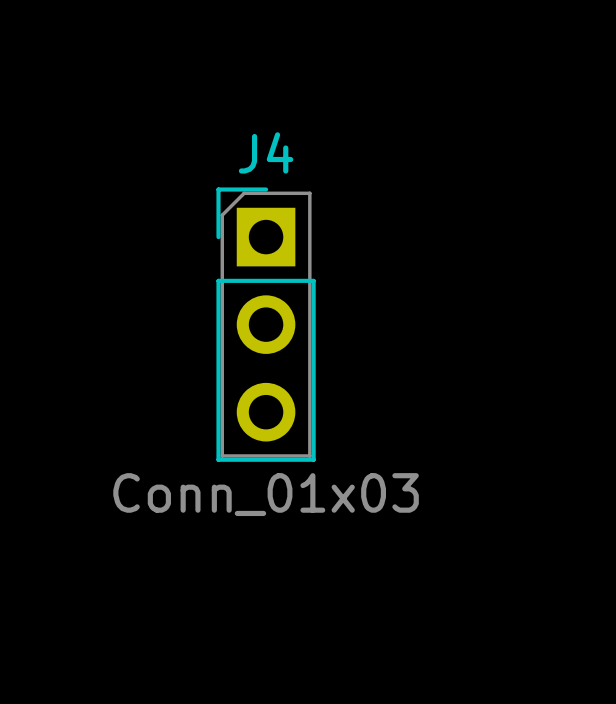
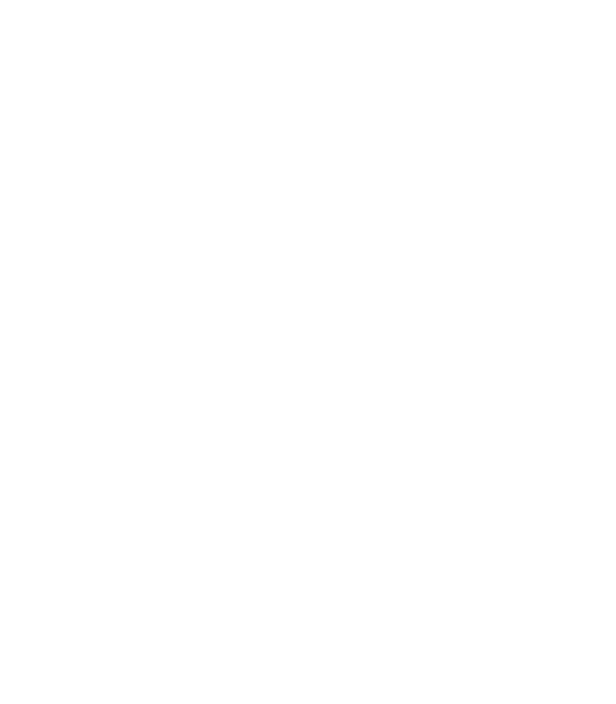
J4: Conn_01x03 (266, 324) -> none

